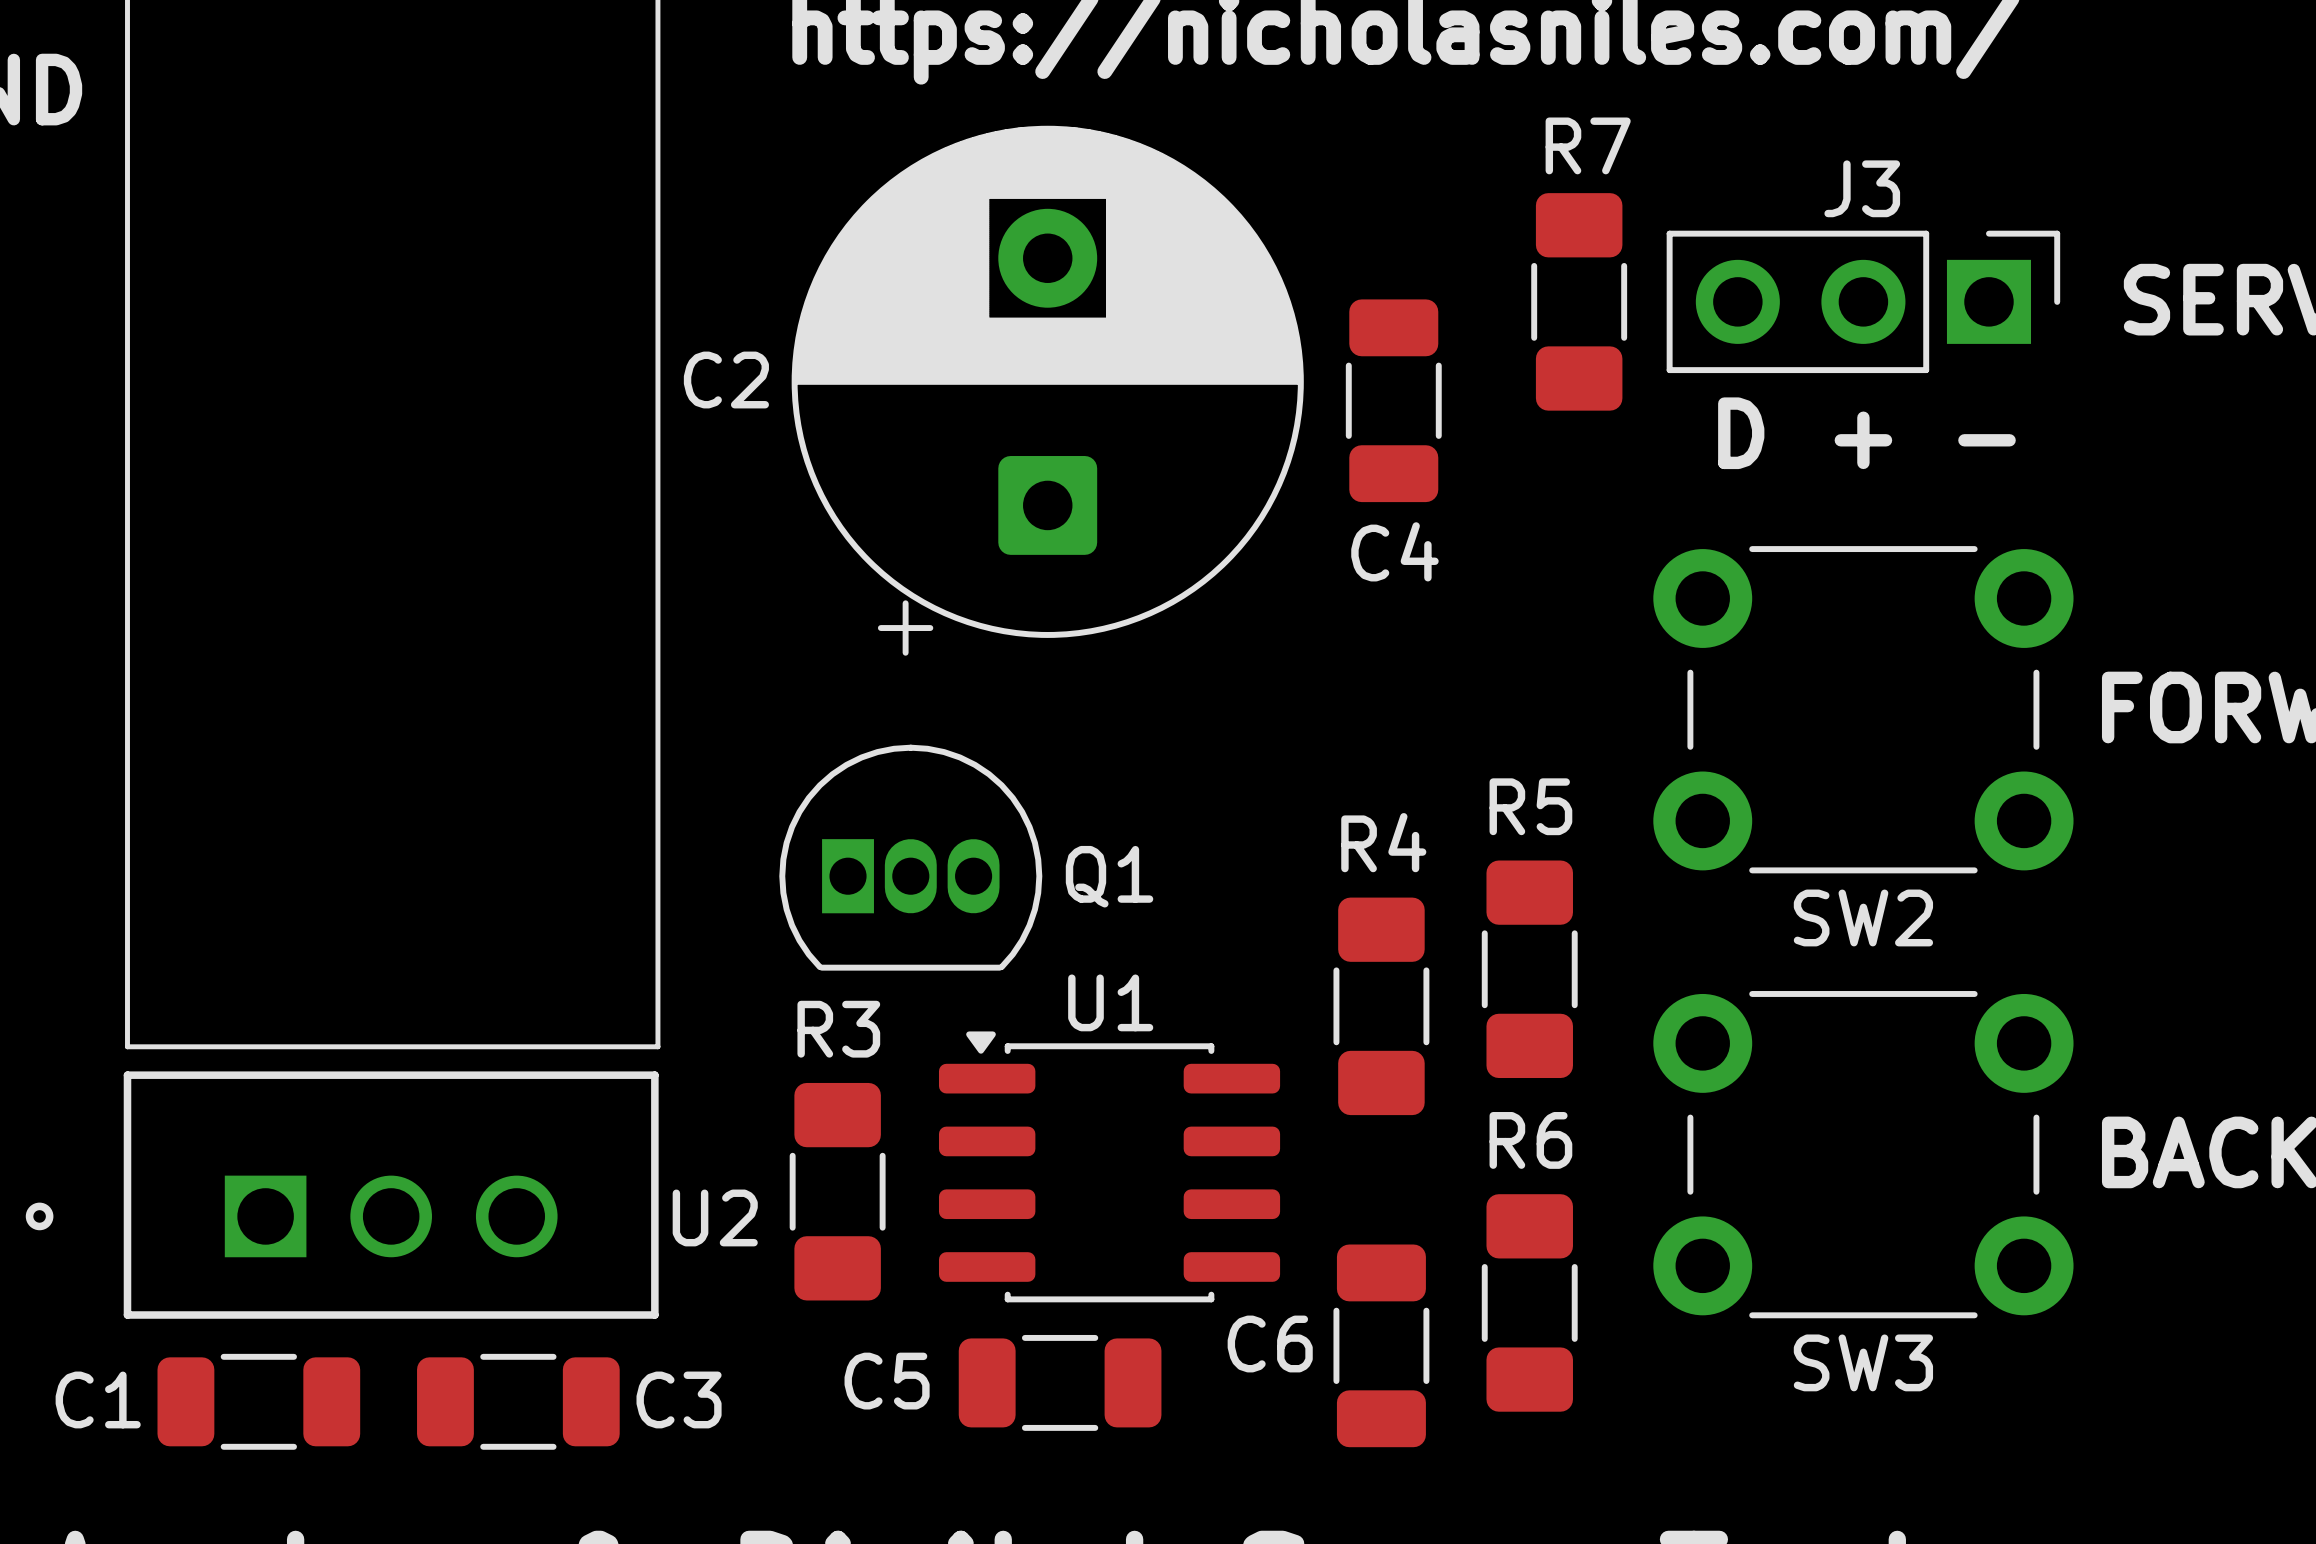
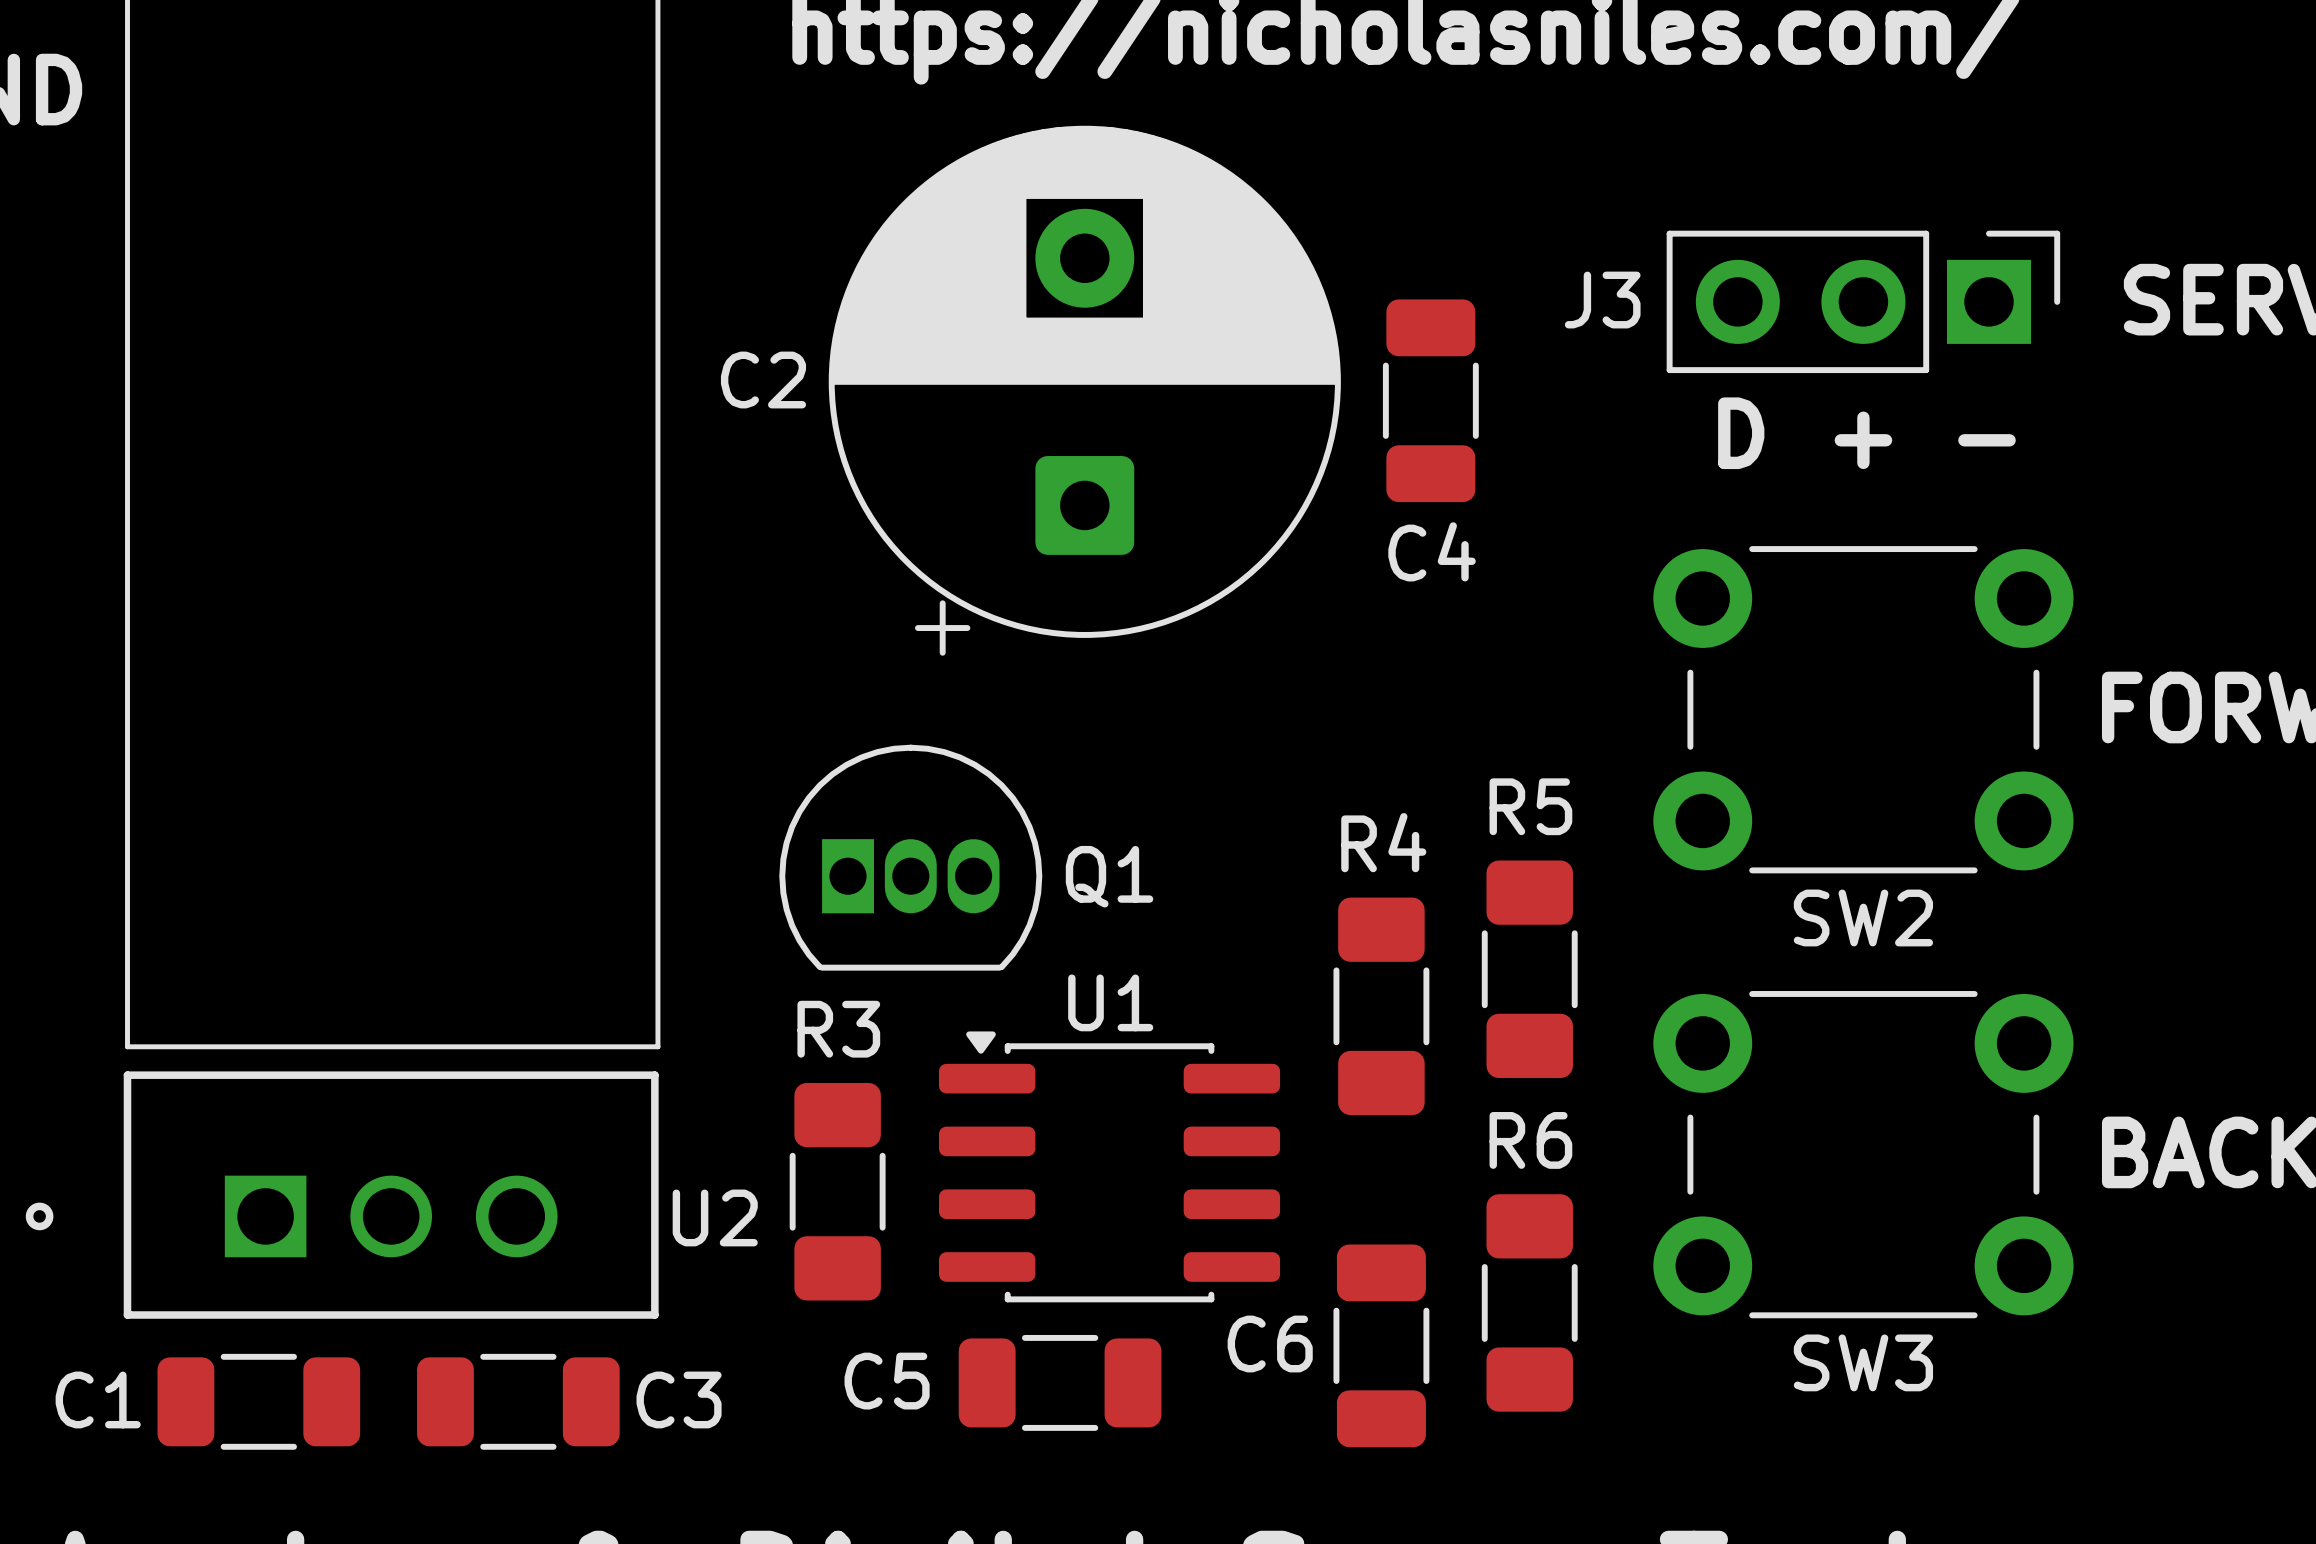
J3 name position: J3 (1862, 188) -> J3 (1602, 300)
R7: (1579, 301) -> none
C2 position: (1047, 390) -> (1084, 390)
C4 position: (1393, 400) -> (1430, 400)

